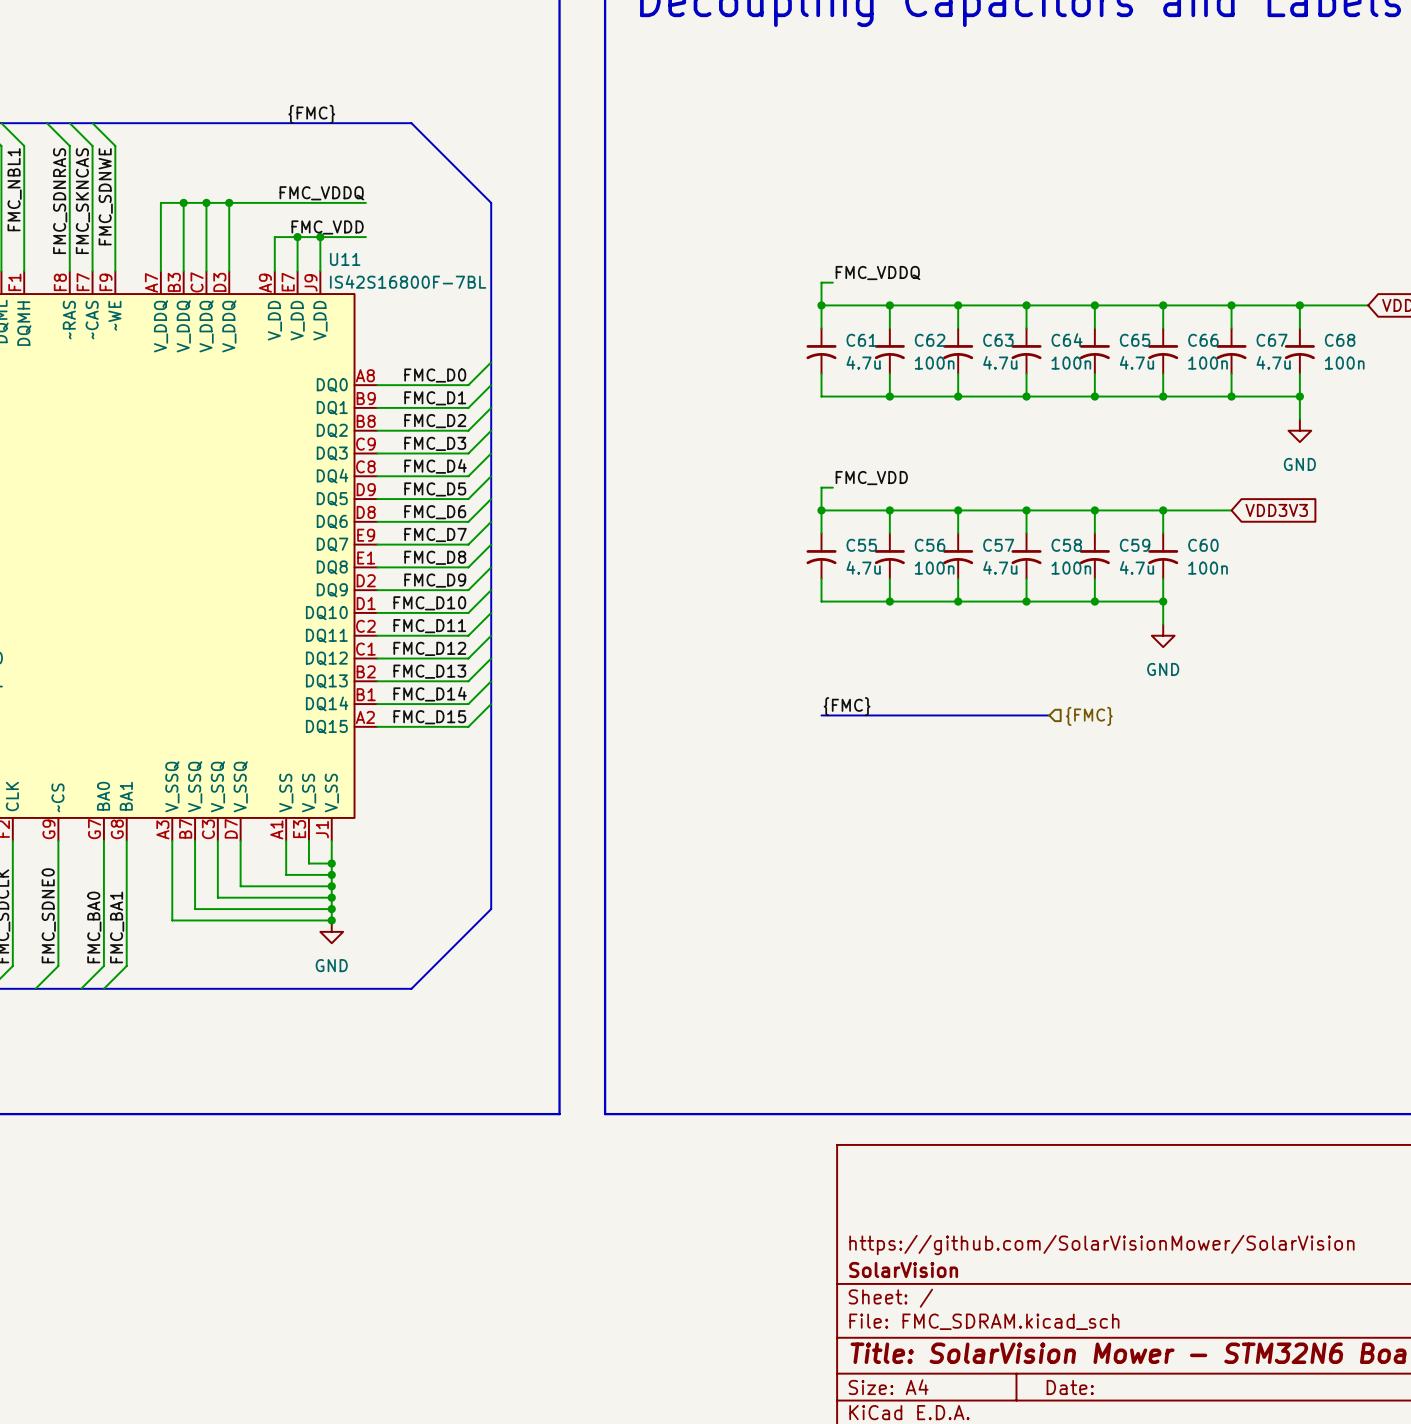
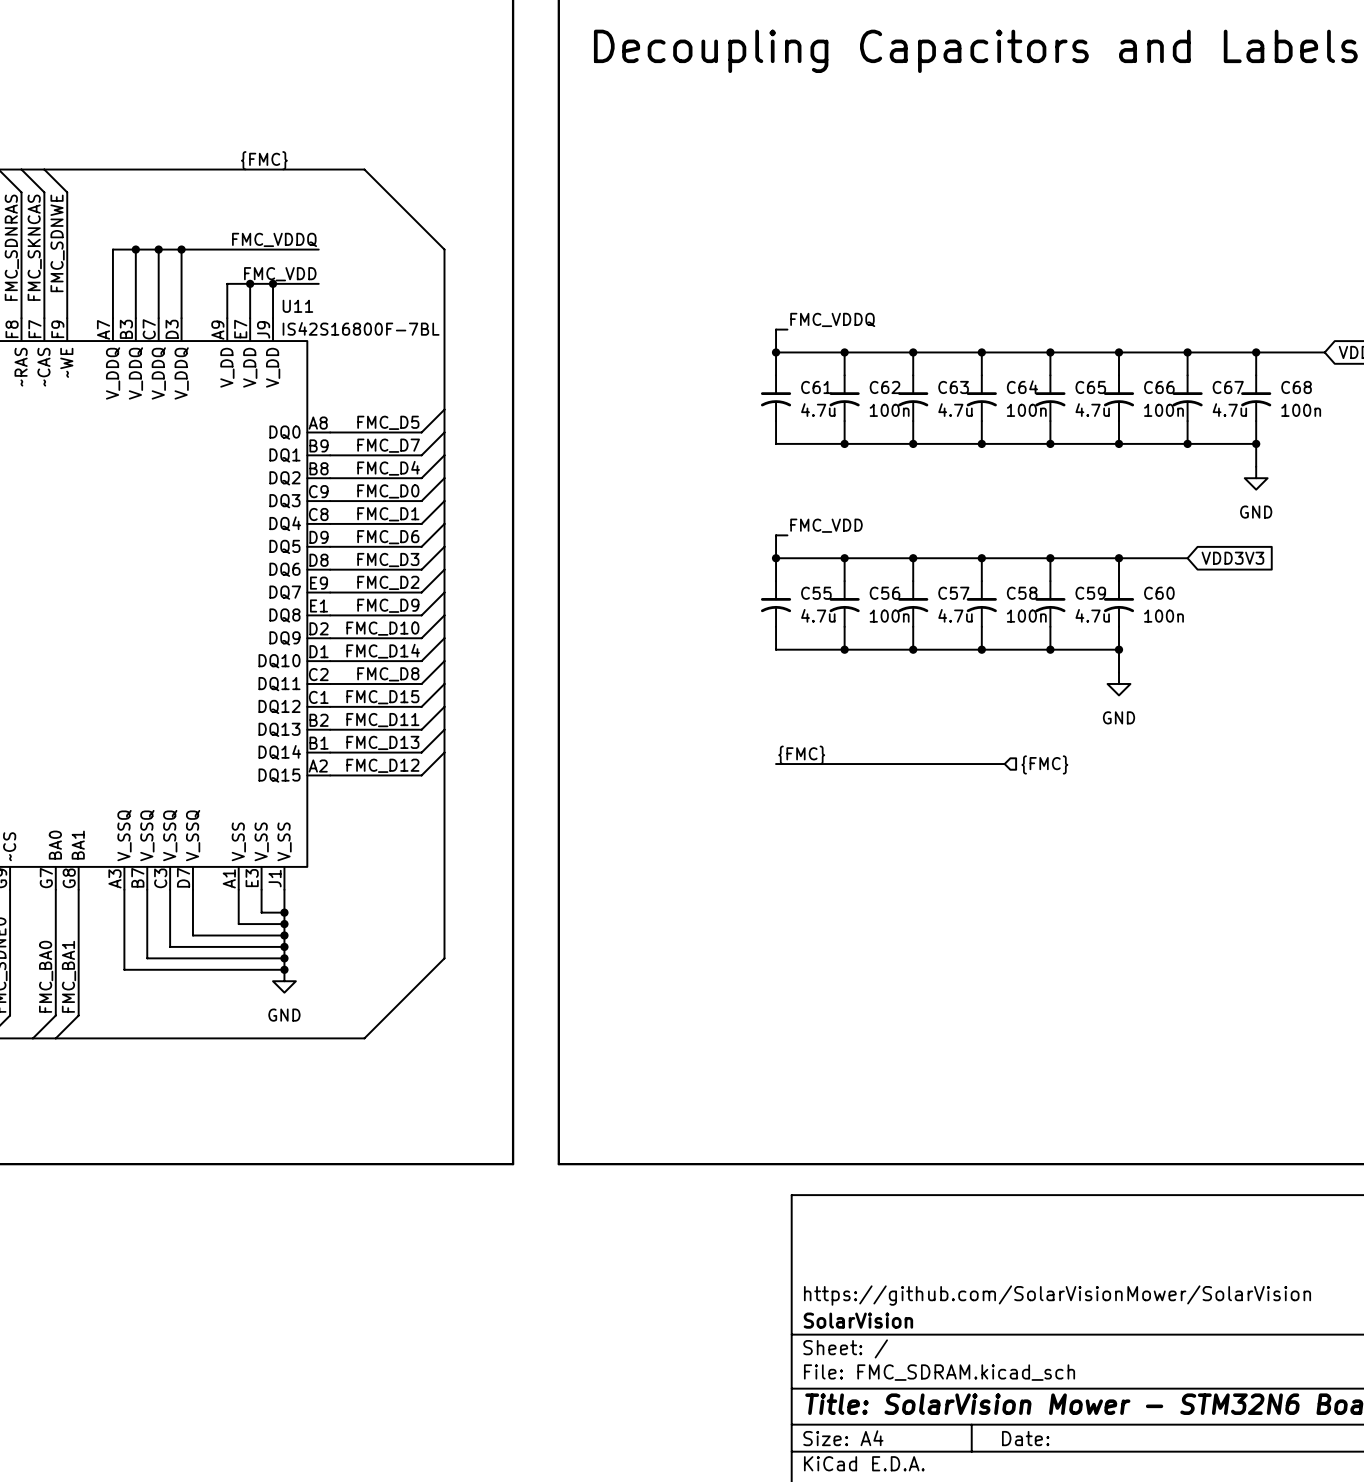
label: FMC_D0 (435, 375) -> FMC_D5 (388, 422)
label: FMC_D1 (435, 398) -> FMC_D7 (388, 445)
label: FMC_D2 (435, 421) -> FMC_D4 (388, 468)
label: FMC_D3 (435, 443) -> FMC_D0 (388, 491)
label: FMC_D4 (435, 466) -> FMC_D1 (388, 514)
label: FMC_D5 (435, 489) -> FMC_D6 (388, 537)
label: FMC_D6 (435, 512) -> FMC_D3 (388, 560)
label: FMC_D7 (435, 534) -> FMC_D2 (388, 582)
label: FMC_D8 (435, 557) -> FMC_D9 (388, 605)
label: FMC_D9 (435, 580) -> FMC_D10 (382, 628)
label: FMC_D10 (429, 603) -> FMC_D14 (383, 651)
label: FMC_D11 (429, 626) -> FMC_D8 (388, 674)
label: FMC_D12 (429, 648) -> FMC_D15 (382, 697)
label: FMC_D13 (429, 671) -> FMC_D11 (382, 720)
label: FMC_D14 (430, 694) -> FMC_D13 (382, 742)
label: FMC_D15 (429, 717) -> FMC_D12 (382, 765)

